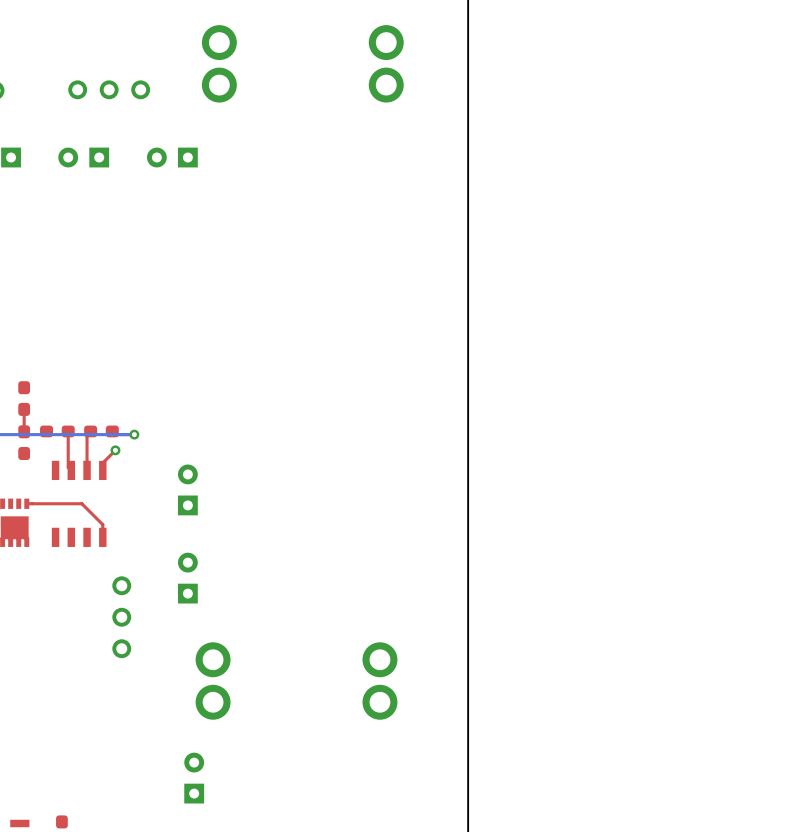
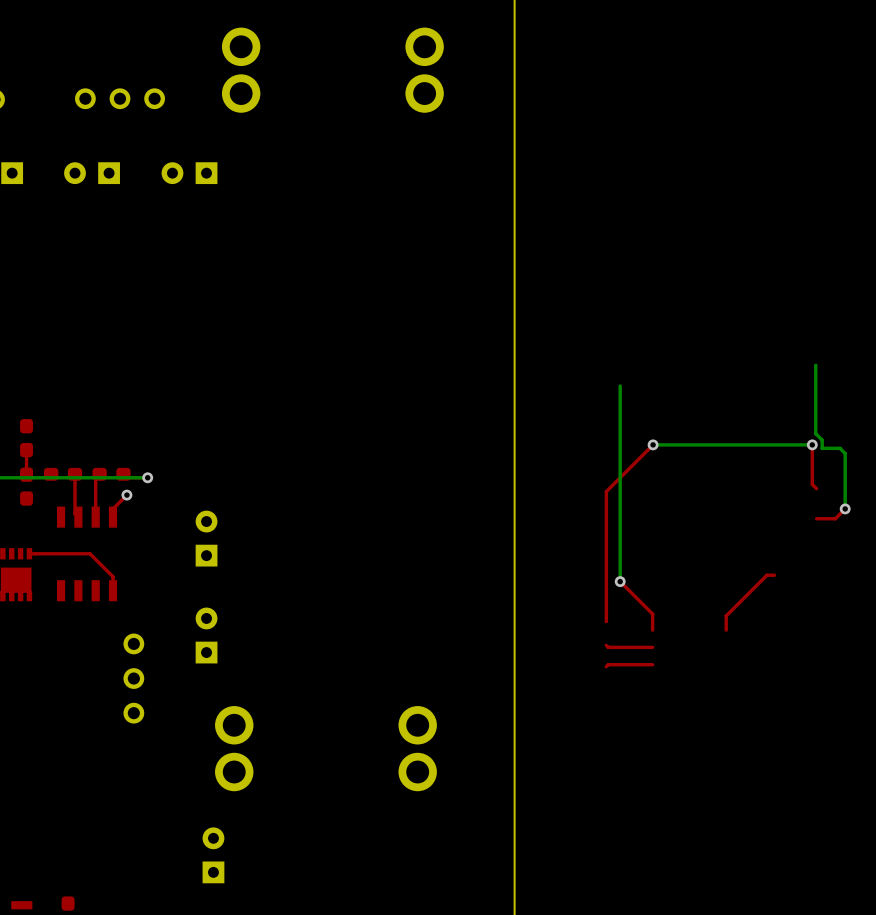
bottom track: none -> (815, 365) (815, 433) (822, 440) (822, 448) (840, 448) (845, 453) (845, 508)
bottom track: none -> (620, 386) (620, 581)
top track: none -> (653, 444) (606, 491) (606, 621)
via: none -> (653, 444)
bottom track: none -> (812, 444) (653, 444)
top track: none -> (812, 444) (812, 484) (816, 488)
via: none -> (812, 444)
top track: none -> (845, 508) (835, 518) (816, 518)
via: none -> (845, 508)
top track: none -> (774, 575) (766, 575) (726, 615) (726, 630)
top track: none -> (620, 581) (652, 614) (652, 630)
via: none -> (620, 581)
top track: none -> (606, 645) (608, 647) (652, 647)
top track: none -> (652, 664) (608, 664) (606, 666)

